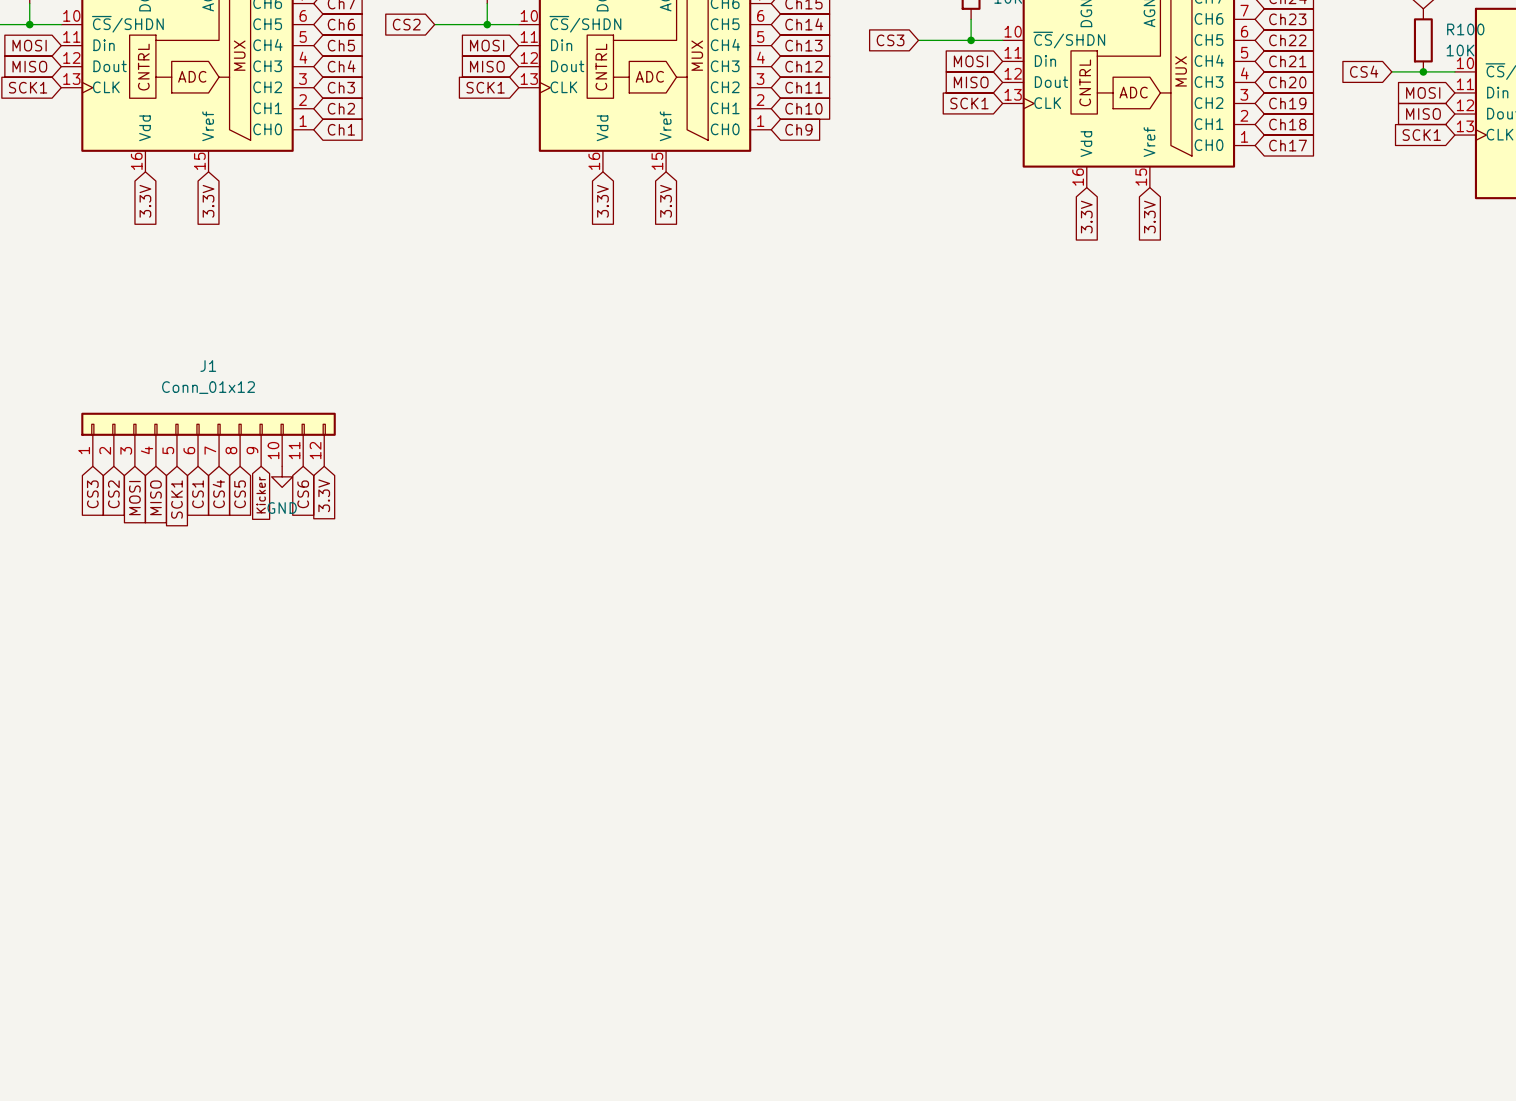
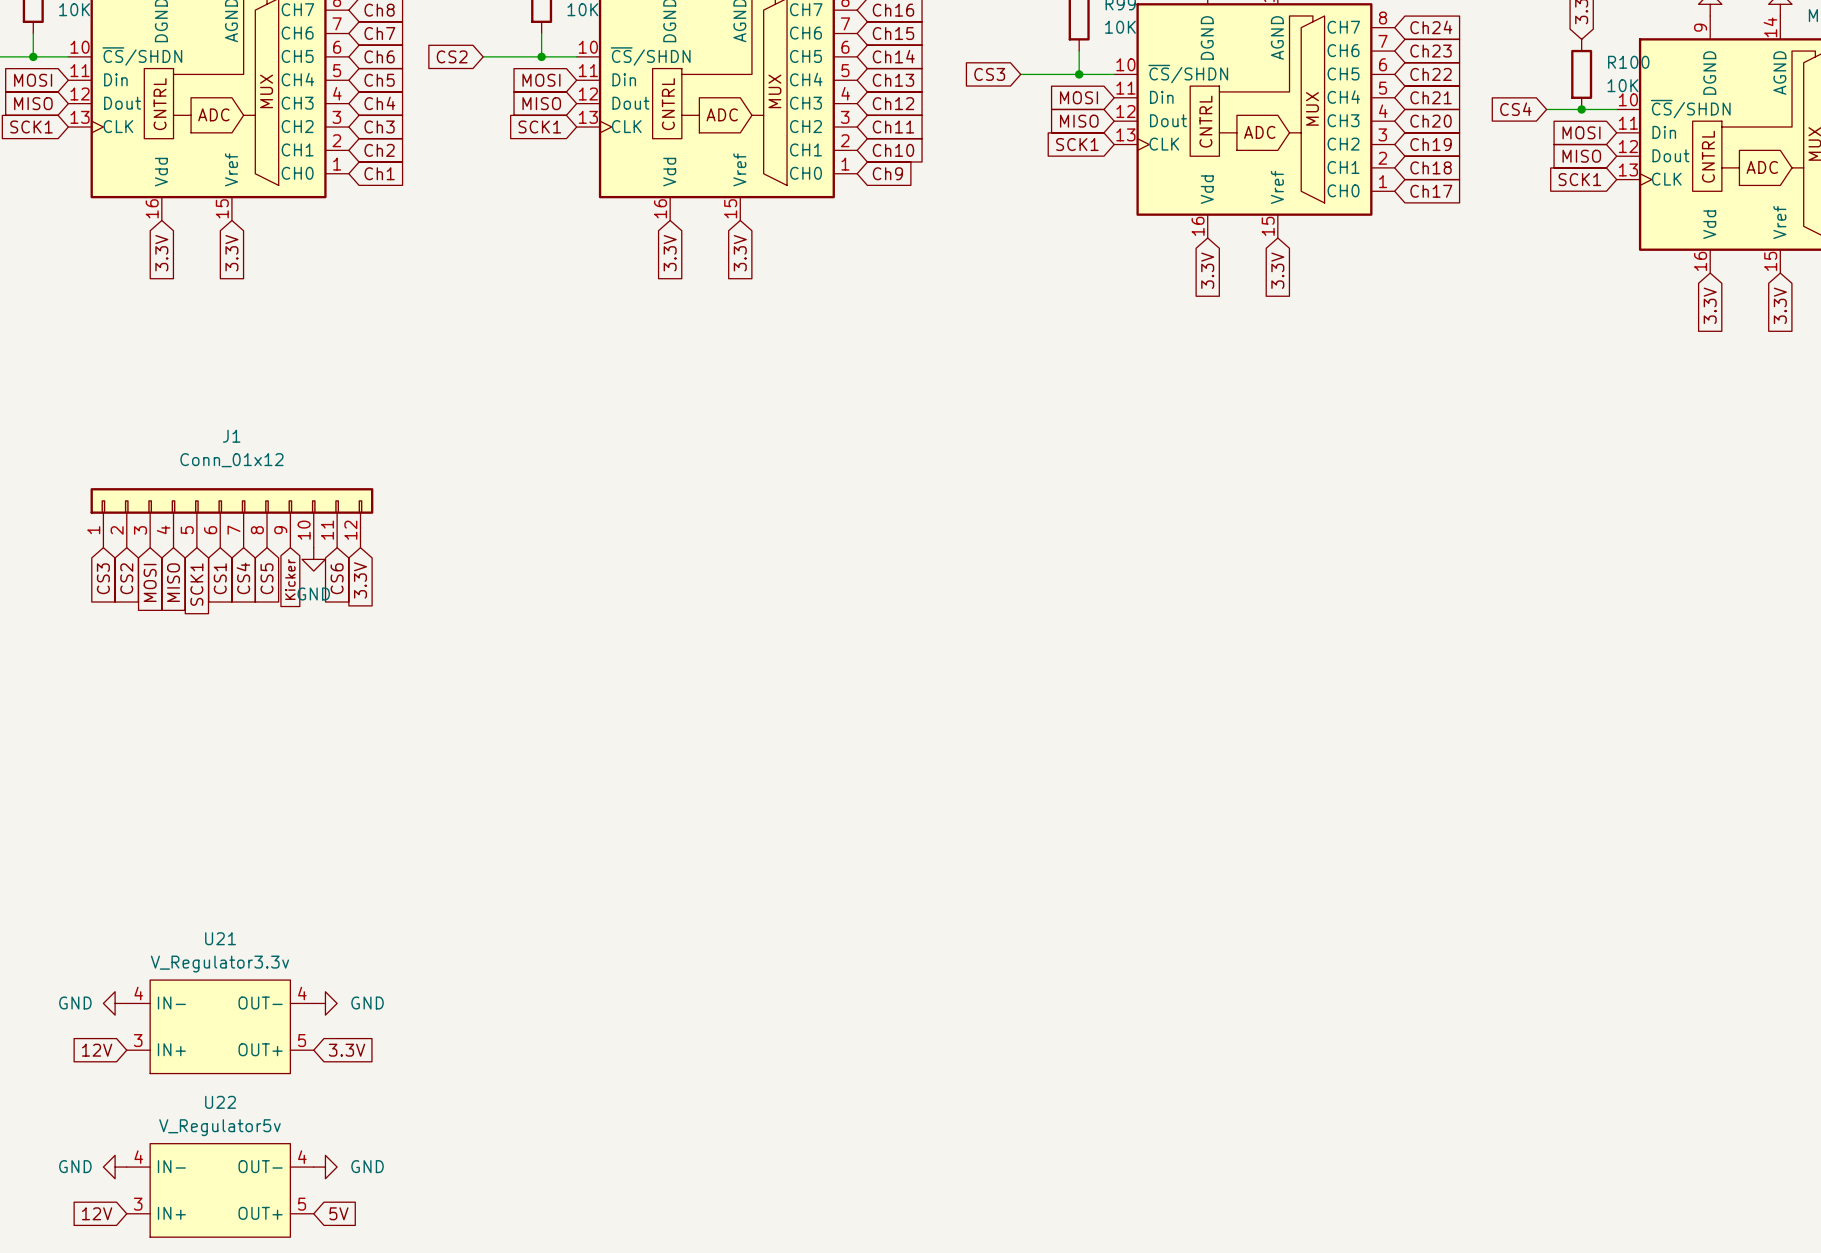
power symbol: none -> GND (115, 1003)
power symbol: none -> GND (325, 1003)
U21: none -> V_Regulator3.3v (220, 1026)
global label: none -> 12V (97, 1050)
global label: none -> 3.3V (347, 1050)
power symbol: none -> GND (115, 1167)
power symbol: none -> GND (325, 1167)
U22: none -> V_Regulator5v (220, 1190)
global label: none -> 12V (97, 1213)
global label: none -> 5V (338, 1213)

